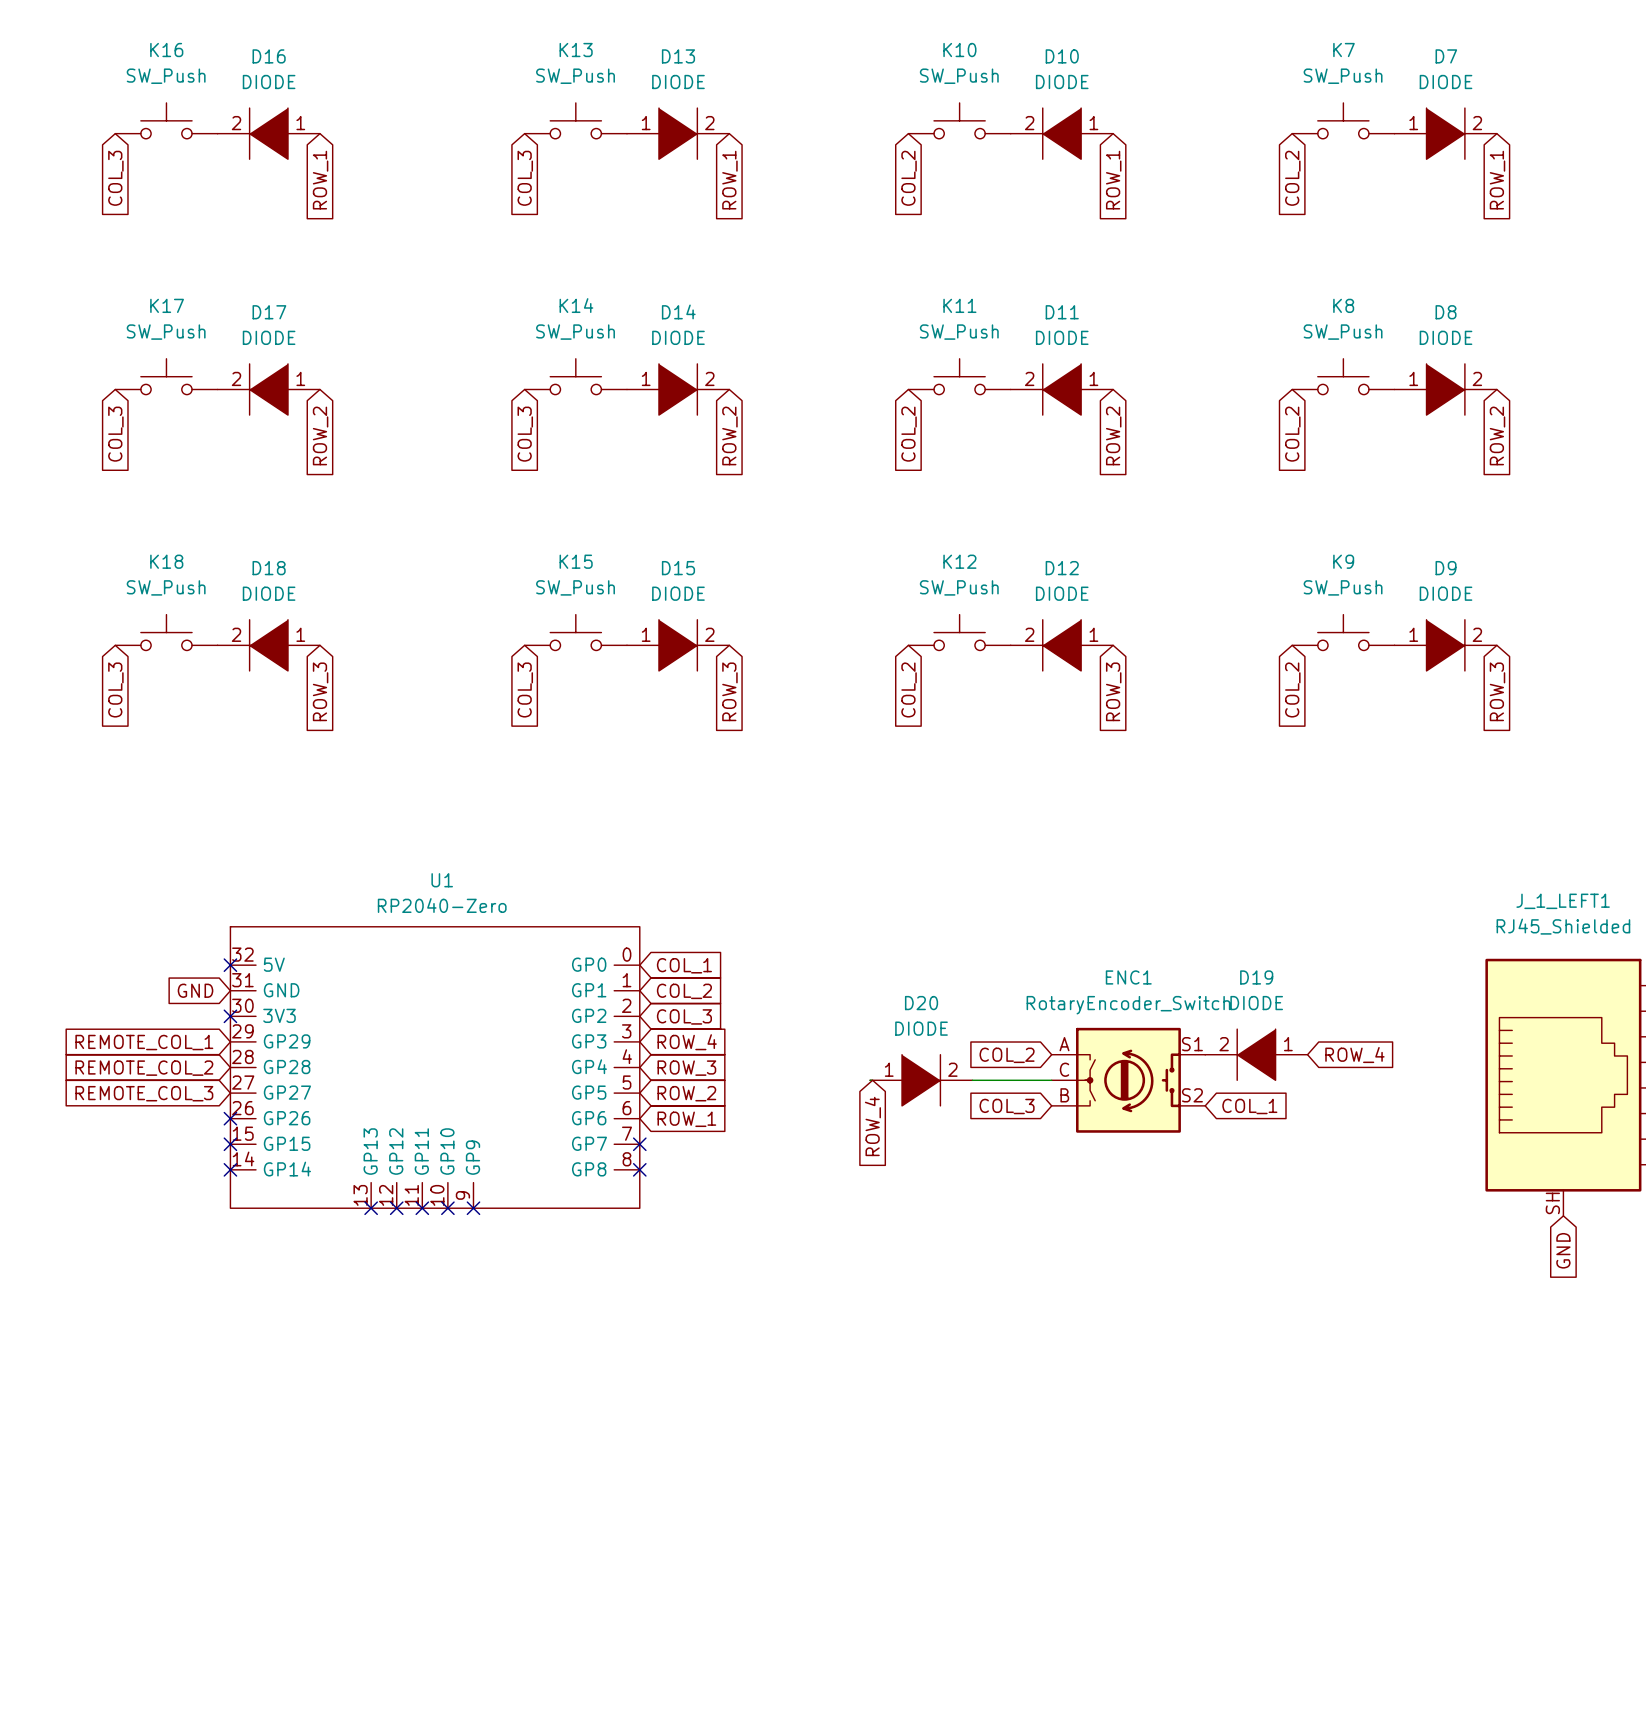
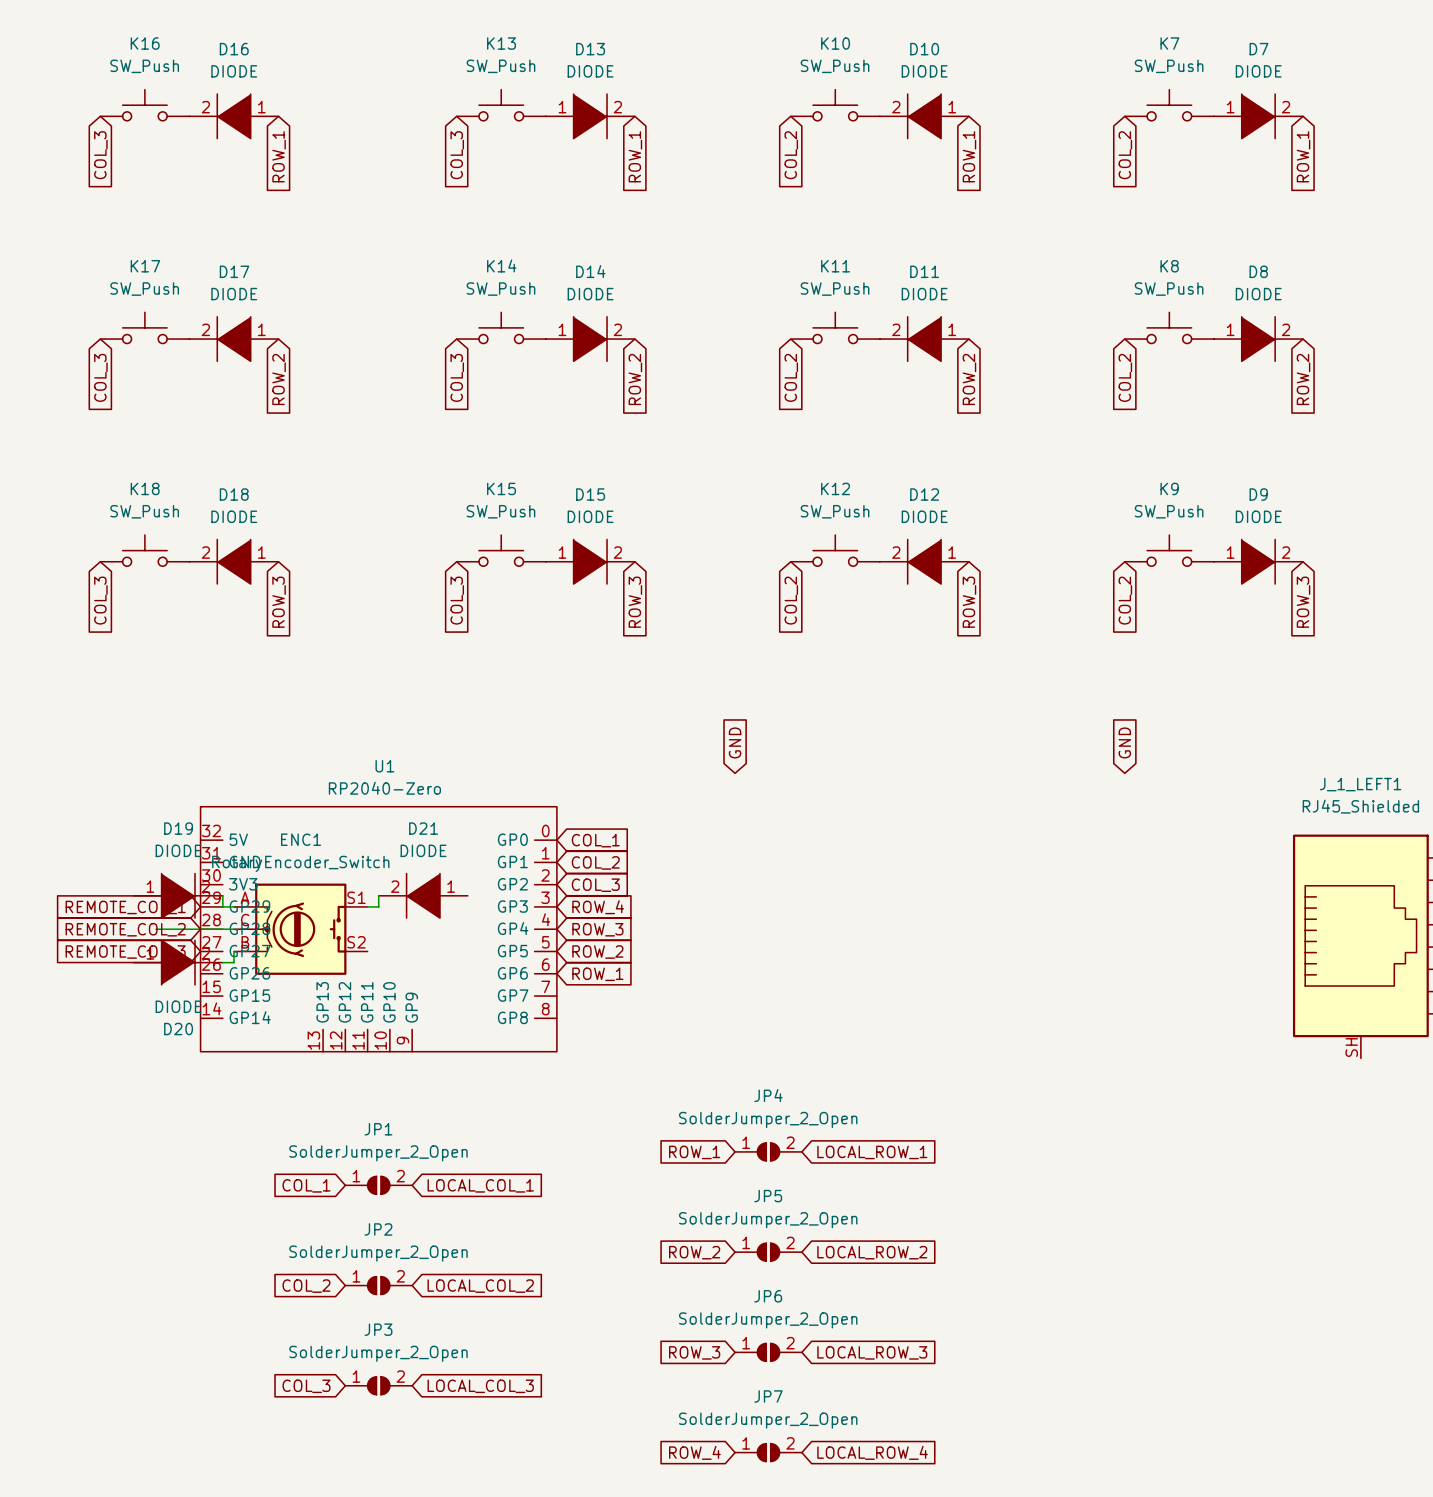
global label: none -> GND (735, 742)
global label: none -> GND (1124, 742)
no-connect mark: (230, 965) -> none
global label: GND (195, 990) -> none
no-connect mark: (230, 1016) -> none
ENC1 symbol: [1051, 1027, 1206, 1133] -> [233, 883, 368, 975]
wire: none -> (222, 895) (222, 906) (233, 906)
wire: none -> (378, 895) (378, 906) (367, 906)
D21: none -> DIODE (423, 895)
D19 flip: as is (1256, 1054) -> left-right (178, 895)
D19 position: (1256, 1054) -> (178, 895)
global label: COL_2 (1007, 1055) -> none
global label: ROW_4 (1354, 1055) -> none
wire: none -> (156, 929) (233, 929)
wire: (870, 1080) (872, 1080) -> none
D20 flip: as is (921, 1080) -> up-down (178, 962)
D20 position: (921, 1080) -> (178, 962)
wire: (972, 1080) (1051, 1080) -> none
wire: none -> (233, 951) (233, 962) (222, 962)
global label: COL_3 (1007, 1106) -> none
global label: COL_1 (1249, 1106) -> none
no-connect mark: (230, 1118) -> none
global label: ROW_4 (872, 1126) -> none
no-connect mark: (230, 1144) -> none
no-connect mark: (639, 1144) -> none
no-connect mark: (230, 1169) -> none
no-connect mark: (639, 1169) -> none
no-connect mark: (371, 1208) -> none
no-connect mark: (396, 1208) -> none
no-connect mark: (422, 1208) -> none
no-connect mark: (447, 1208) -> none
no-connect mark: (473, 1208) -> none
global label: GND (1563, 1250) -> none
global label: none -> ROW_1 (694, 1152)
JP4: none -> SolderJumper_2_Open (768, 1151)
global label: none -> LOCAL_ROW_1 (872, 1152)
JP1: none -> SolderJumper_2_Open (378, 1185)
global label: none -> COL_1 (306, 1185)
global label: none -> LOCAL_COL_1 (480, 1185)
JP5: none -> SolderJumper_2_Open (768, 1252)
global label: none -> ROW_2 (694, 1252)
global label: none -> LOCAL_ROW_2 (872, 1252)
JP2: none -> SolderJumper_2_Open (378, 1285)
global label: none -> COL_2 (306, 1286)
global label: none -> LOCAL_COL_2 (480, 1286)
JP6: none -> SolderJumper_2_Open (768, 1352)
global label: none -> ROW_3 (694, 1352)
global label: none -> LOCAL_ROW_3 (872, 1352)
global label: none -> COL_3 (306, 1386)
JP3: none -> SolderJumper_2_Open (378, 1385)
global label: none -> LOCAL_COL_3 (480, 1386)
JP7: none -> SolderJumper_2_Open (768, 1452)
global label: none -> ROW_4 (694, 1452)
global label: none -> LOCAL_ROW_4 (872, 1452)

